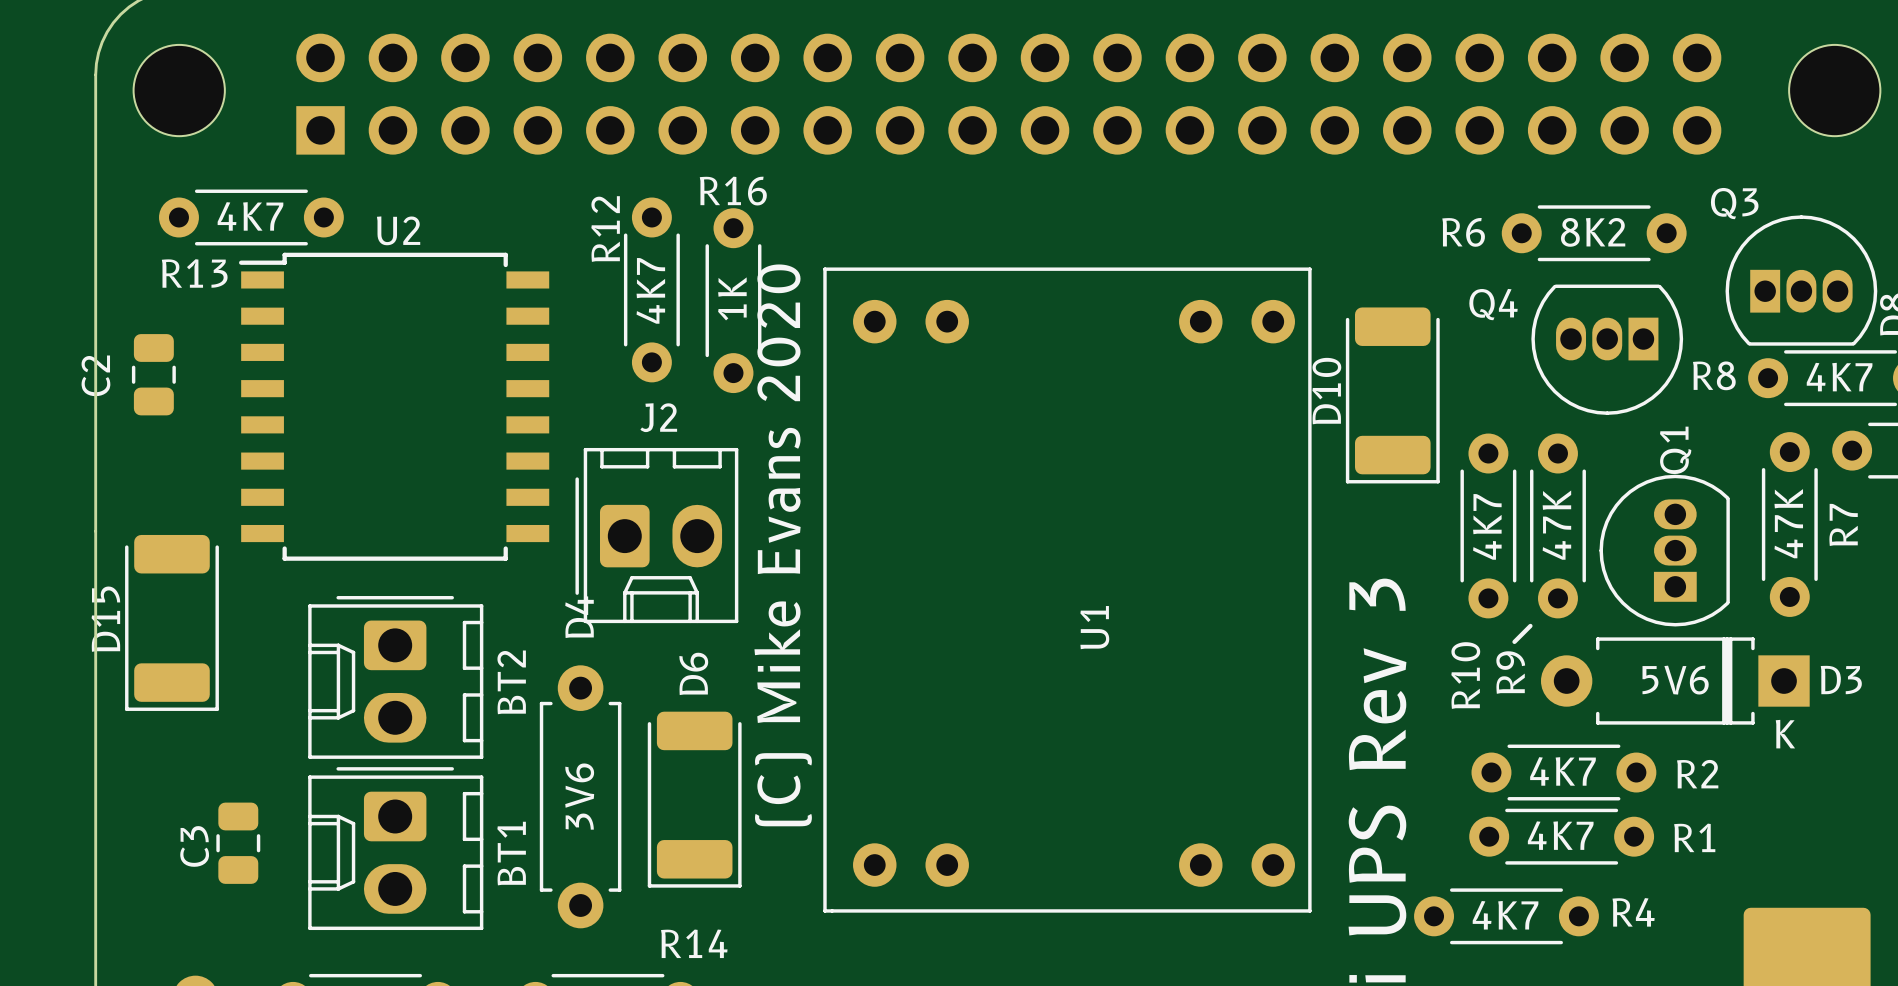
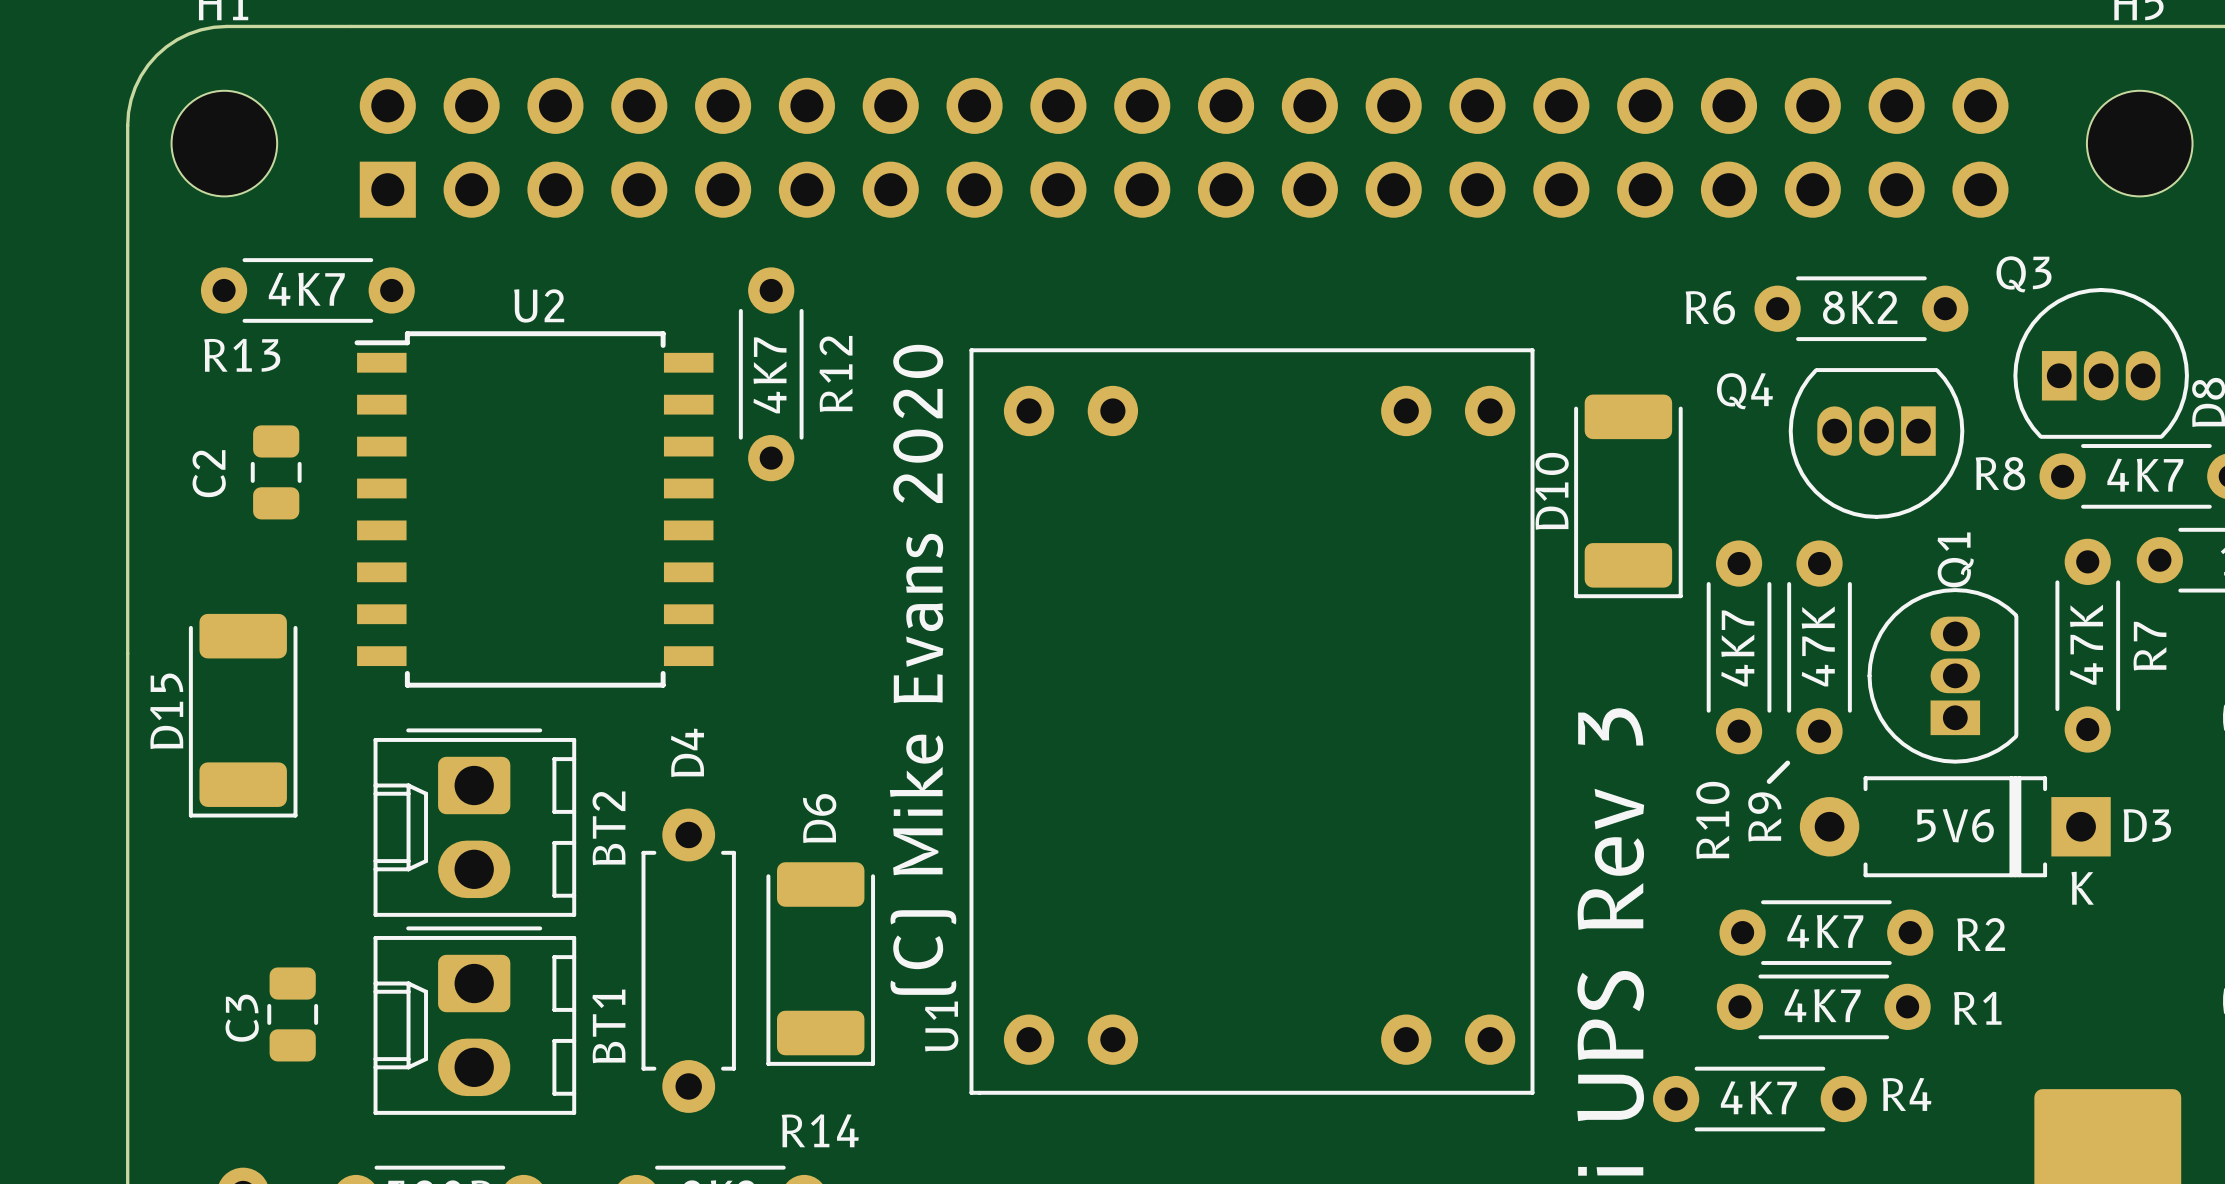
R12 name position: R12 (605, 229) -> R12 (835, 373)
R16: 1K (733, 300) -> none
C2 position: (153, 374) -> (276, 472)
U2 position: (394, 406) -> (534, 509)
J2: (656, 535) -> none
D15 position: (171, 622) -> (243, 715)
U1 name position: U1 (1094, 627) -> U1 (941, 1026)
D4 value: 3V6 (579, 796) -> none

